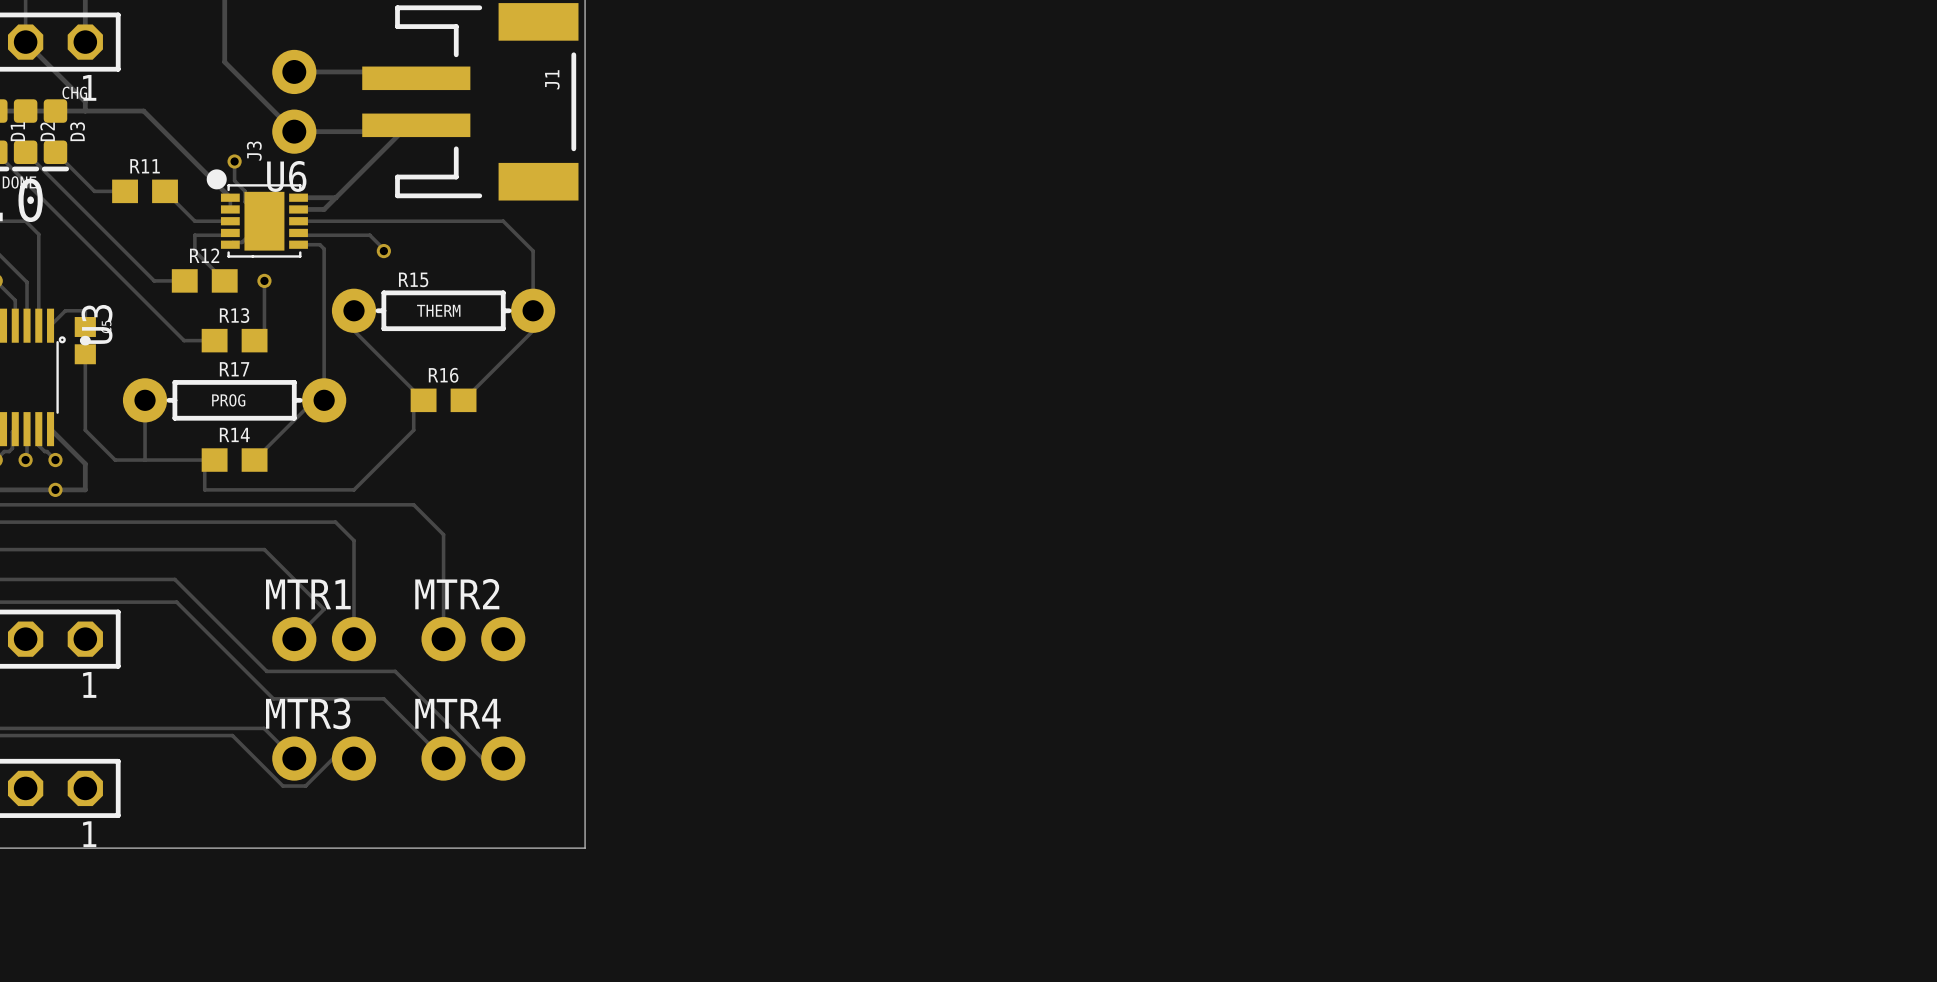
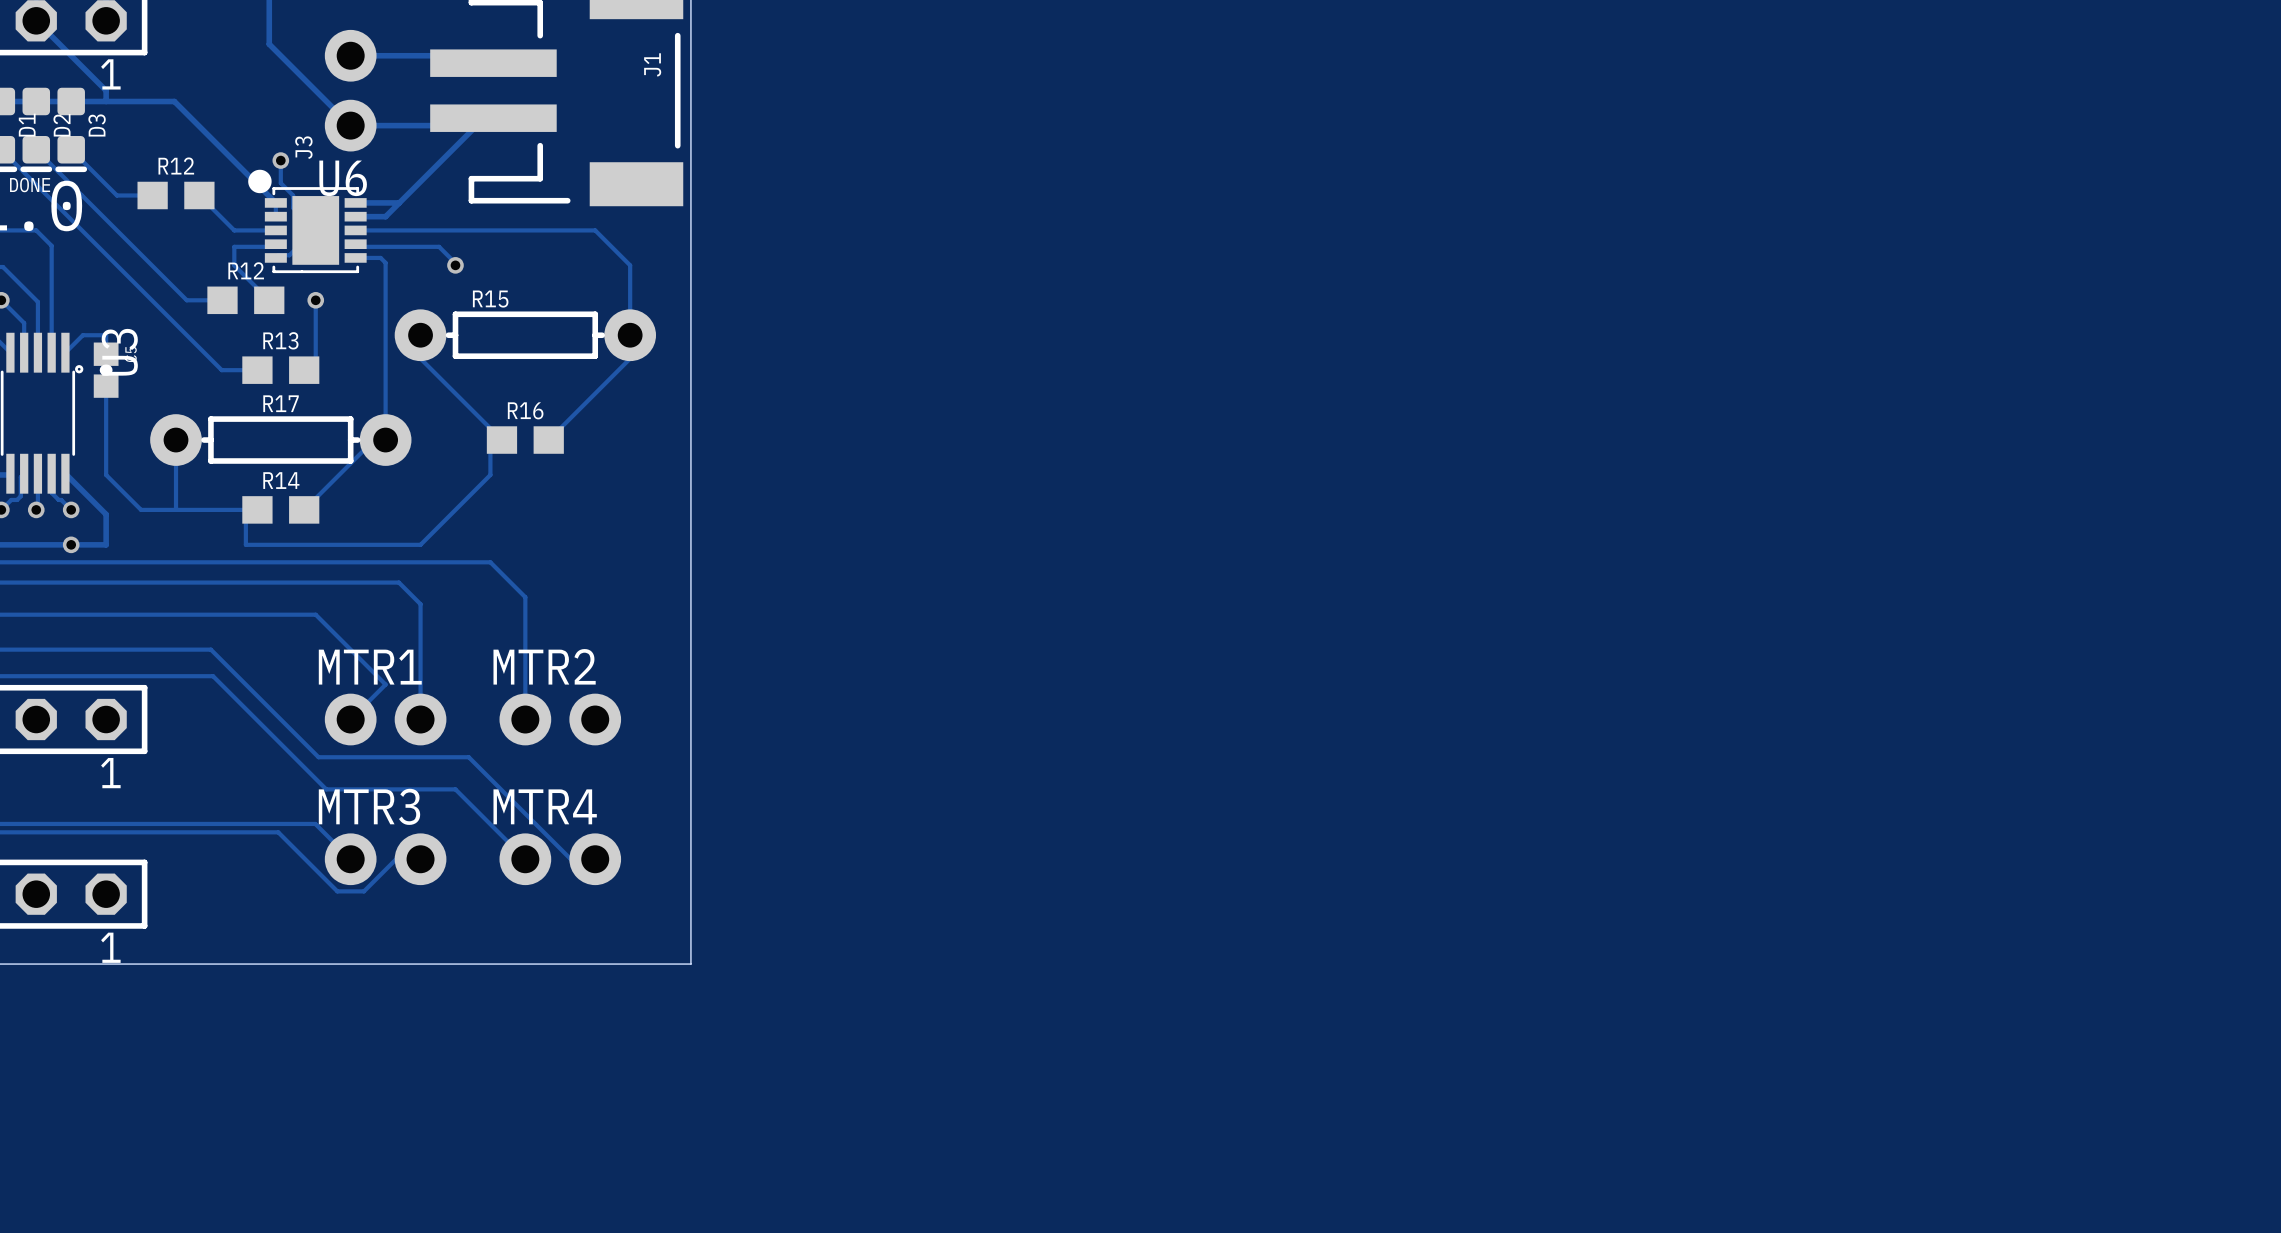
text: CHG (74, 92) -> none
R11 name: R11 (145, 166) -> R12 (176, 166)
text: THERM (438, 310) -> none
text: PROG (228, 400) -> none

